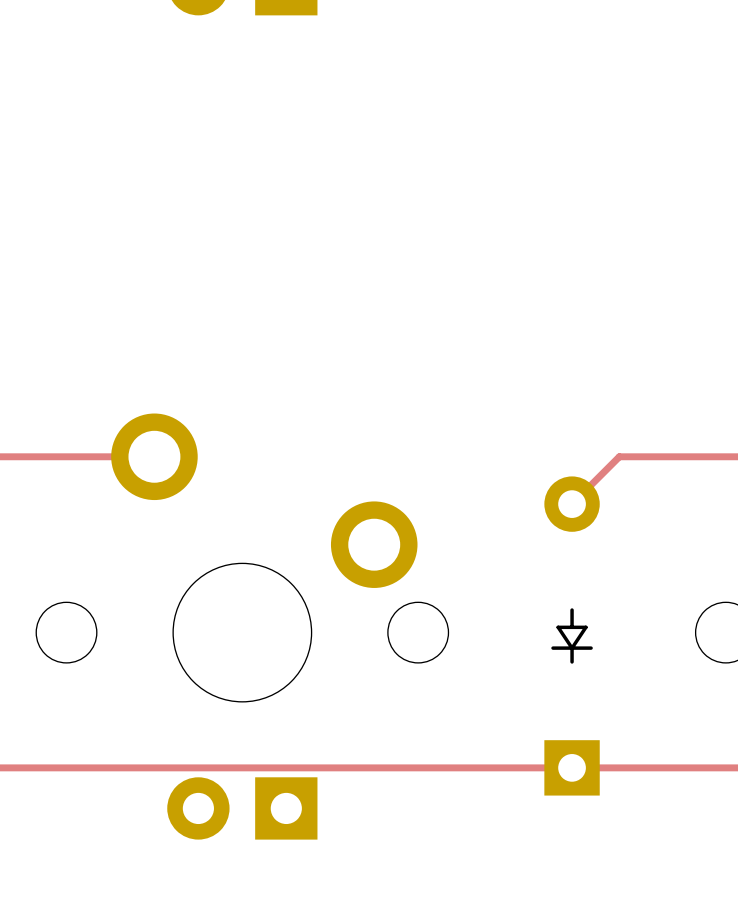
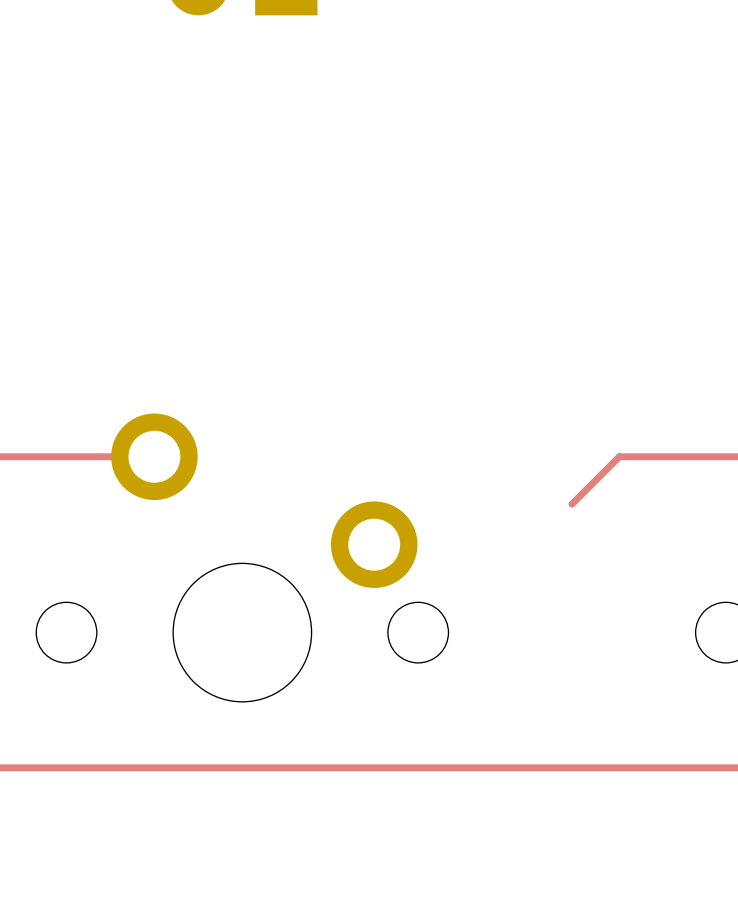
part: (572, 635) -> none
part: (242, 808) -> none

